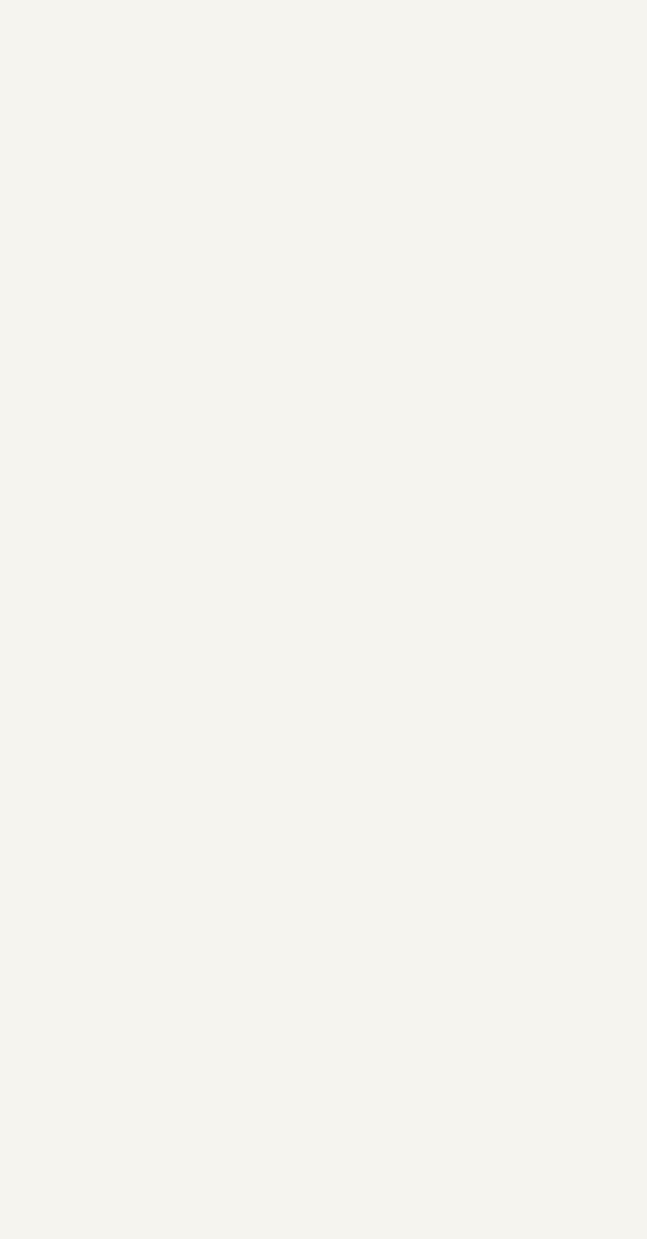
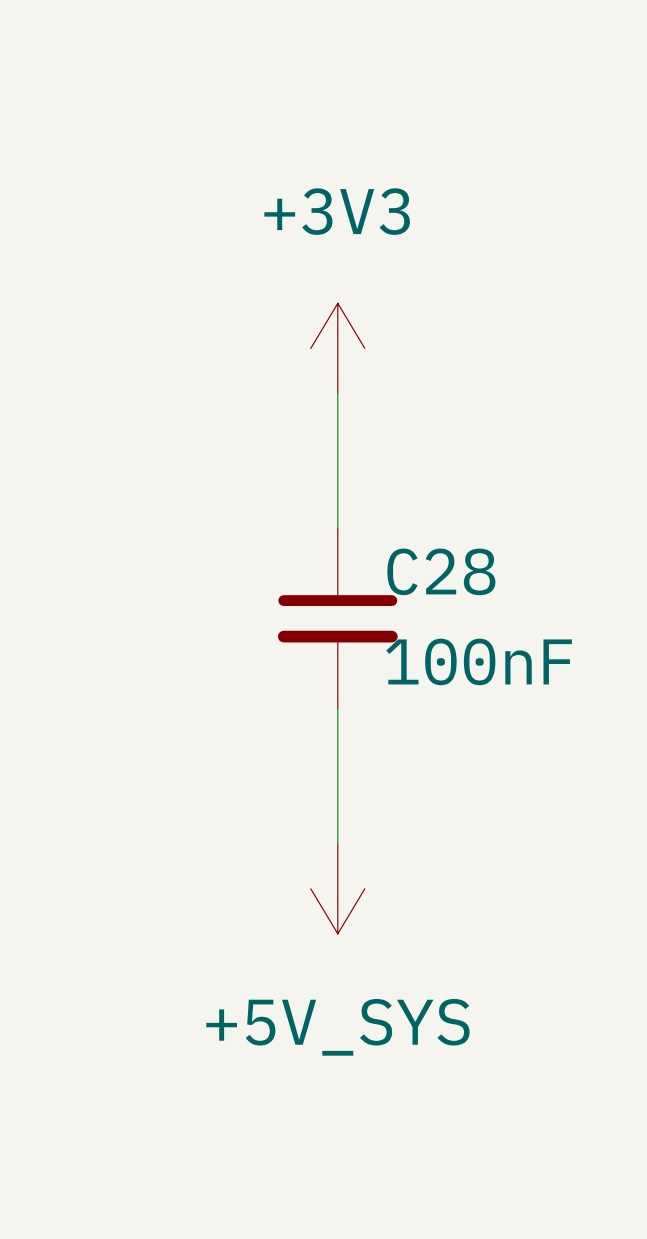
power symbol: none -> +3V3 (337, 348)
wire: none -> (337, 393) (337, 528)
C28: none -> 100nF (337, 618)
wire: none -> (337, 708) (337, 843)
power symbol: none -> +5V_SYS (337, 888)

